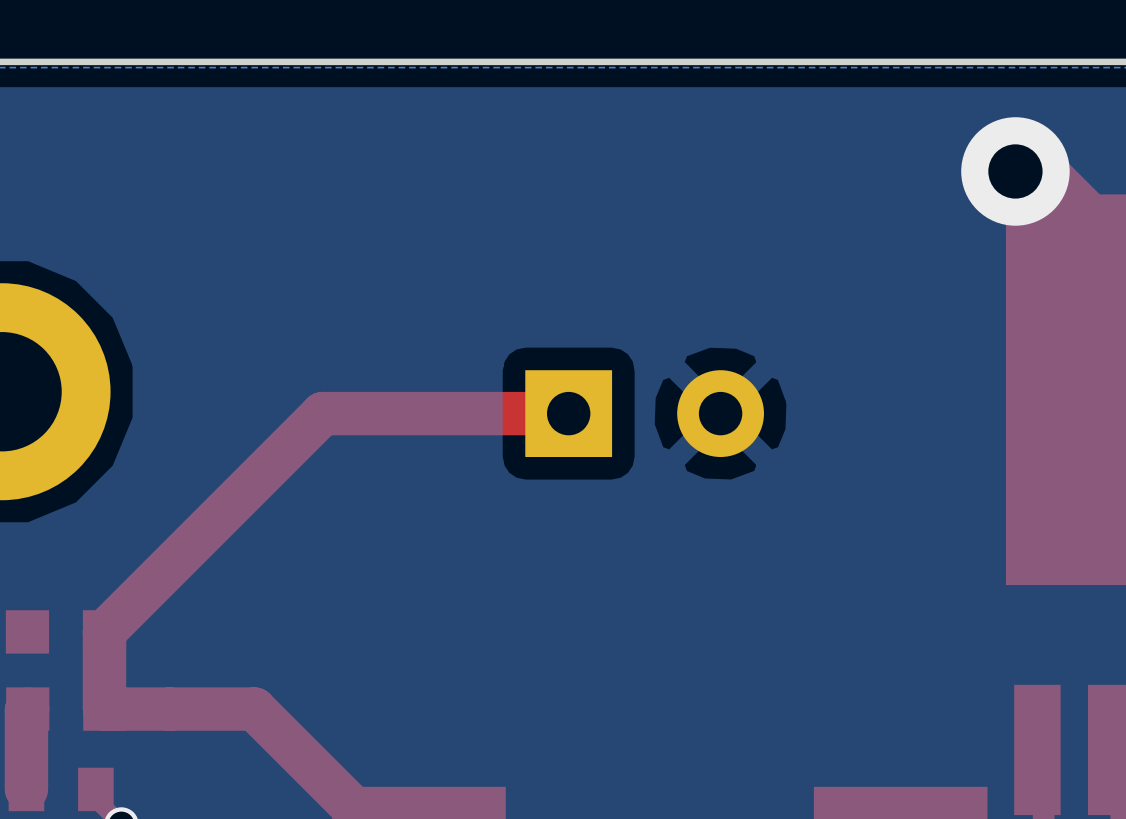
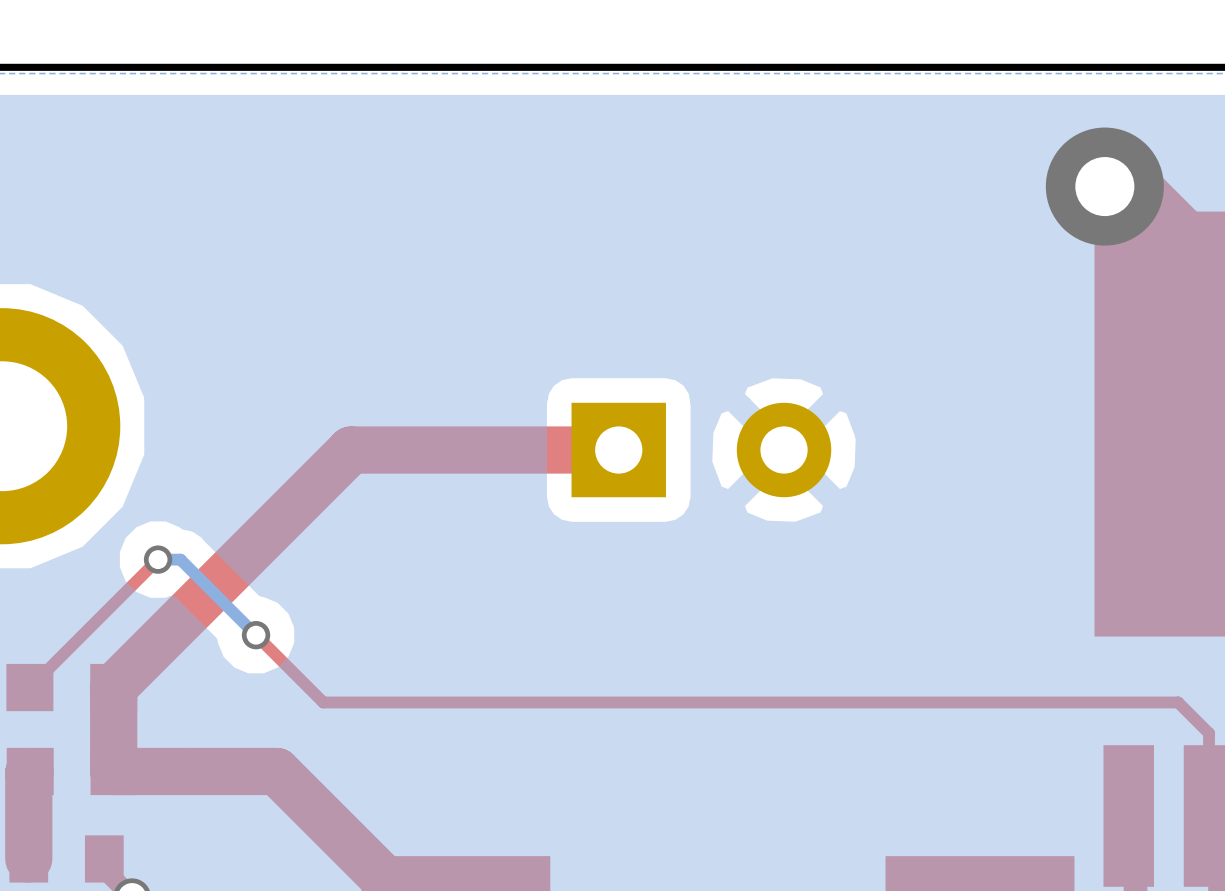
top track: none -> (158, 559) (30, 687)
bottom track: none -> (158, 559) (180, 559) (256, 635)
via: none -> (158, 559)
top track: none -> (256, 635) (323, 702) (1178, 702) (1209, 733) (1209, 815)
via: none -> (256, 635)

